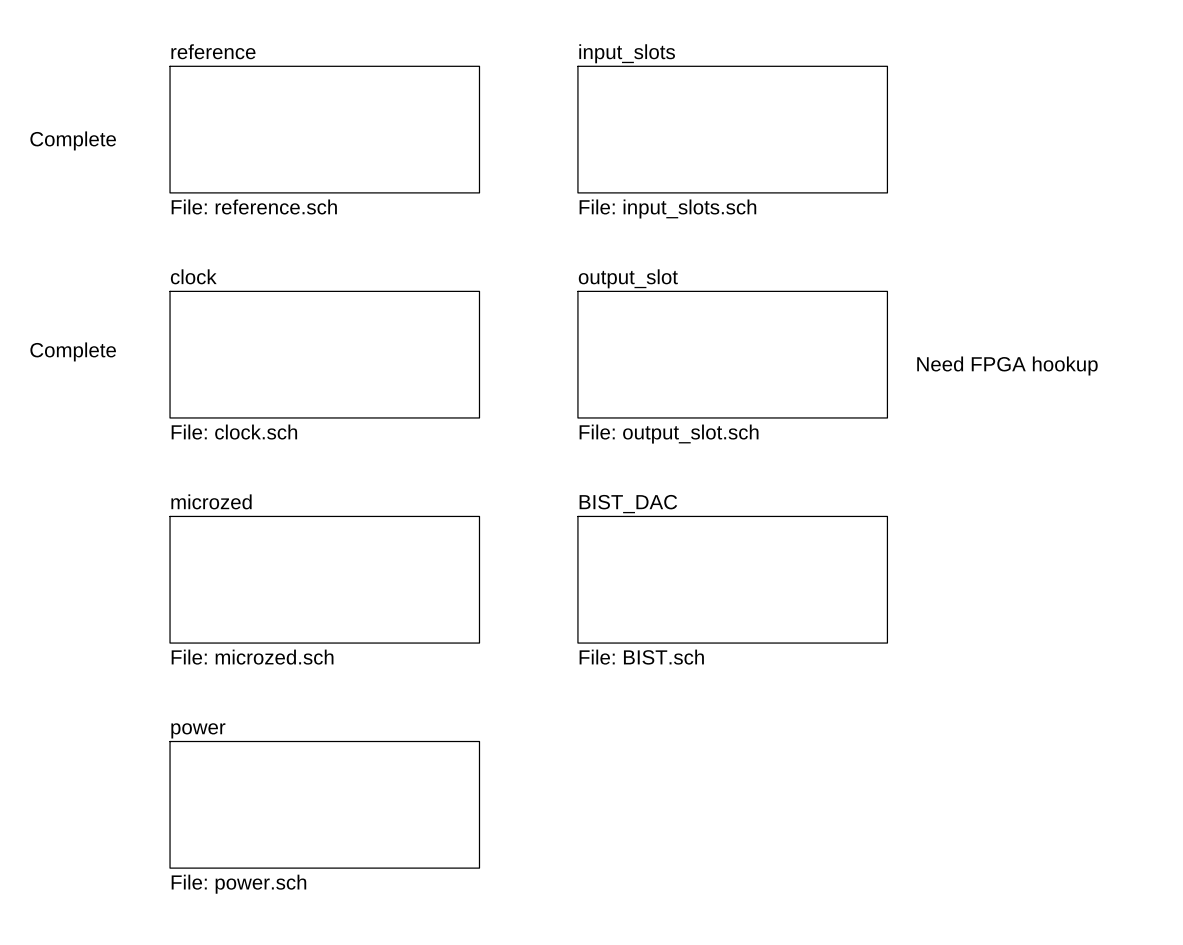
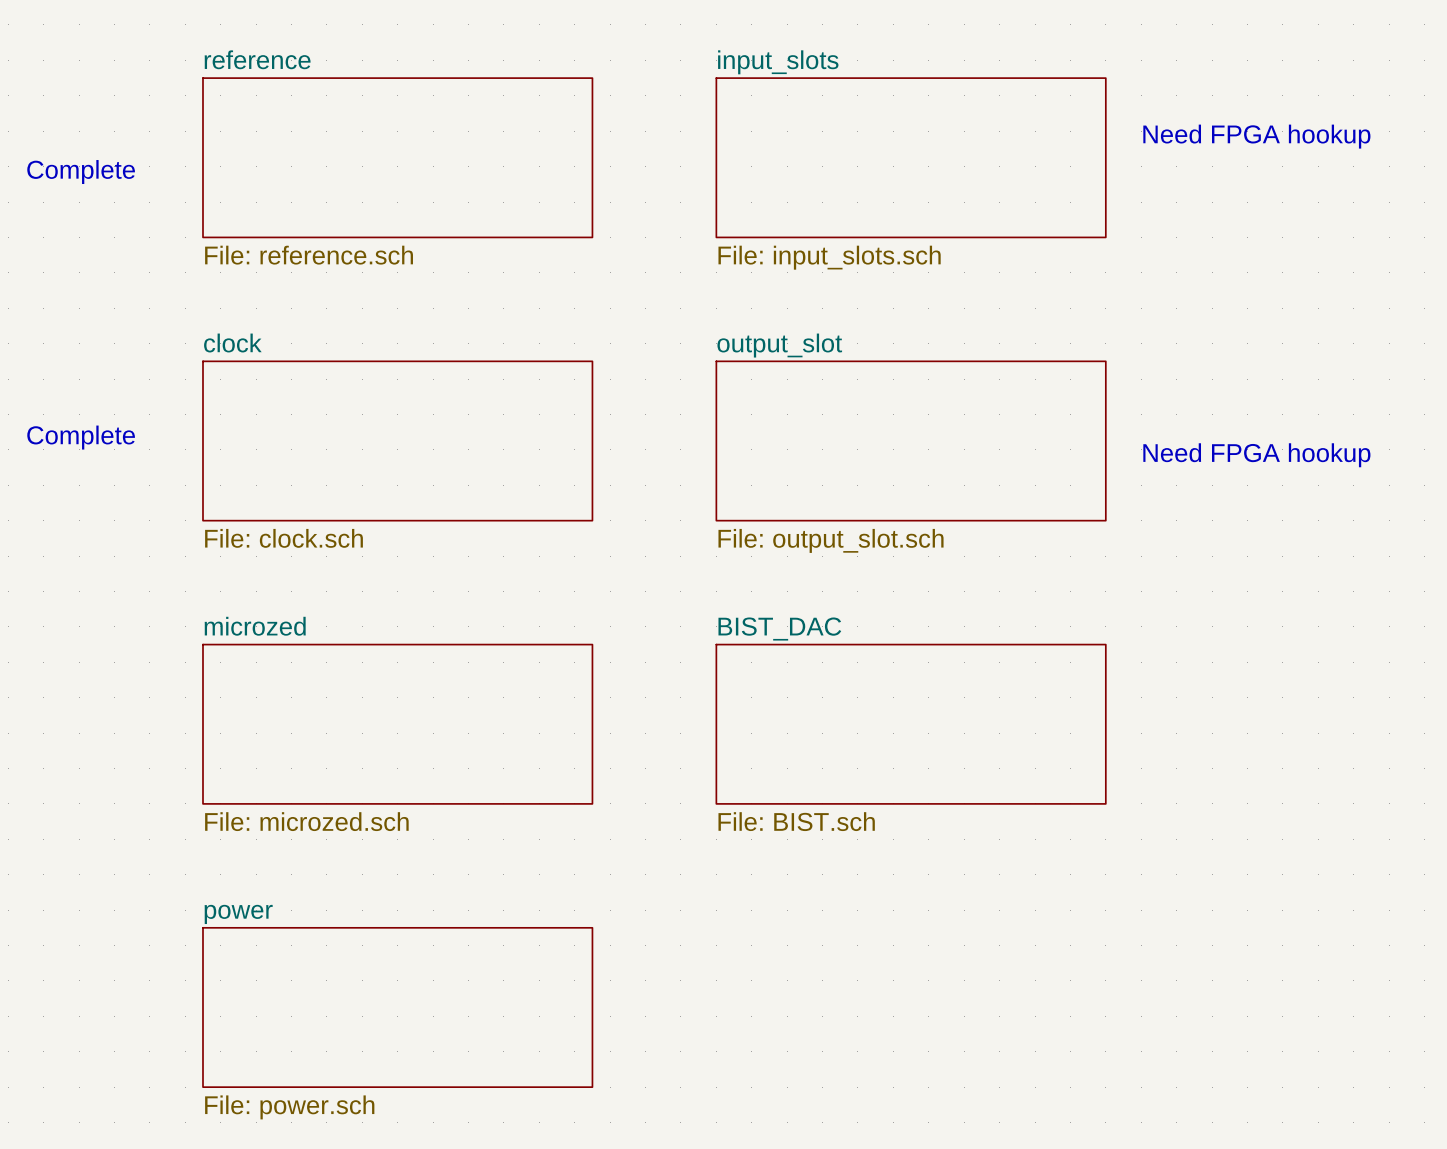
text: none -> Need FPGA hookup (1256, 136)

